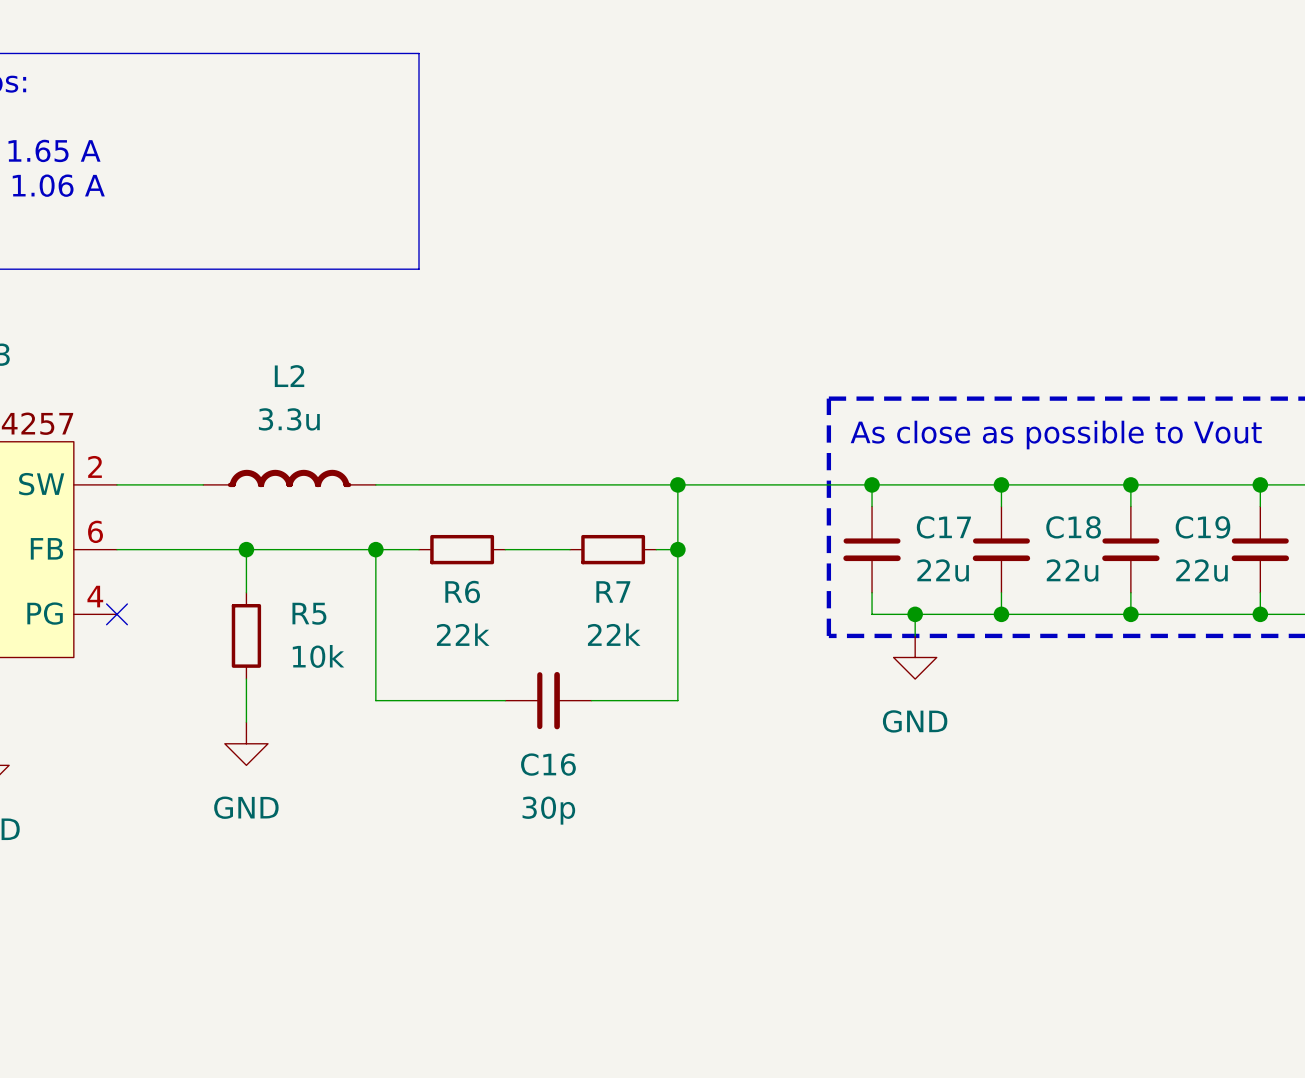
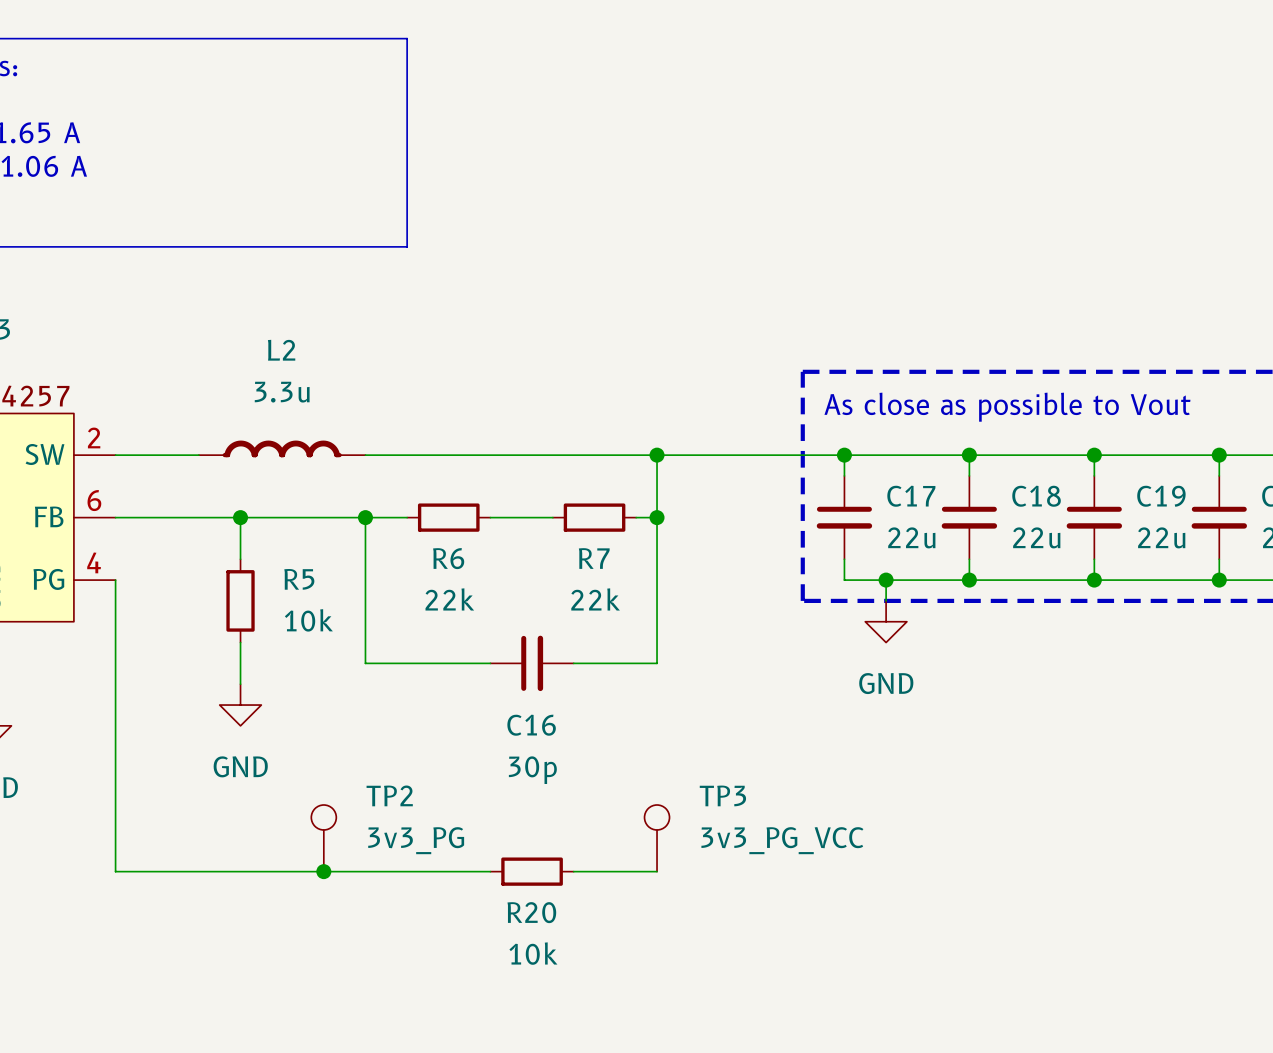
wire: none -> (115, 580) (115, 871) (490, 871)
no-connect mark: (116, 614) -> none
TP2: none -> 3v3_PG (323, 838)
TP3: none -> 3v3_PG_VCC (657, 838)
junction: none -> (323, 871)
R20: none -> 10k (532, 871)
wire: none -> (573, 871) (657, 871)

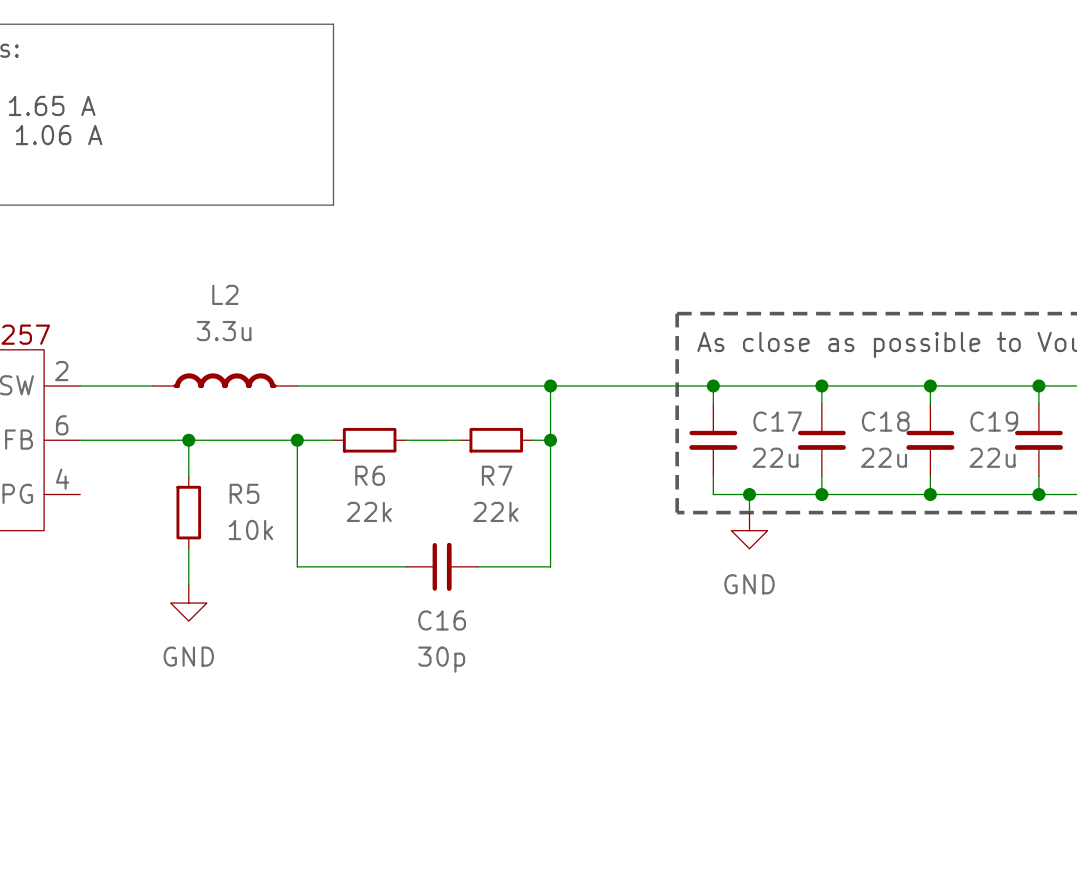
wire: (115, 580) (115, 871) (490, 871) -> none
TP2: 3v3_PG (323, 838) -> none
TP3: 3v3_PG_VCC (657, 838) -> none
junction: (323, 871) -> none
R20: 10k (532, 871) -> none
wire: (573, 871) (657, 871) -> none

